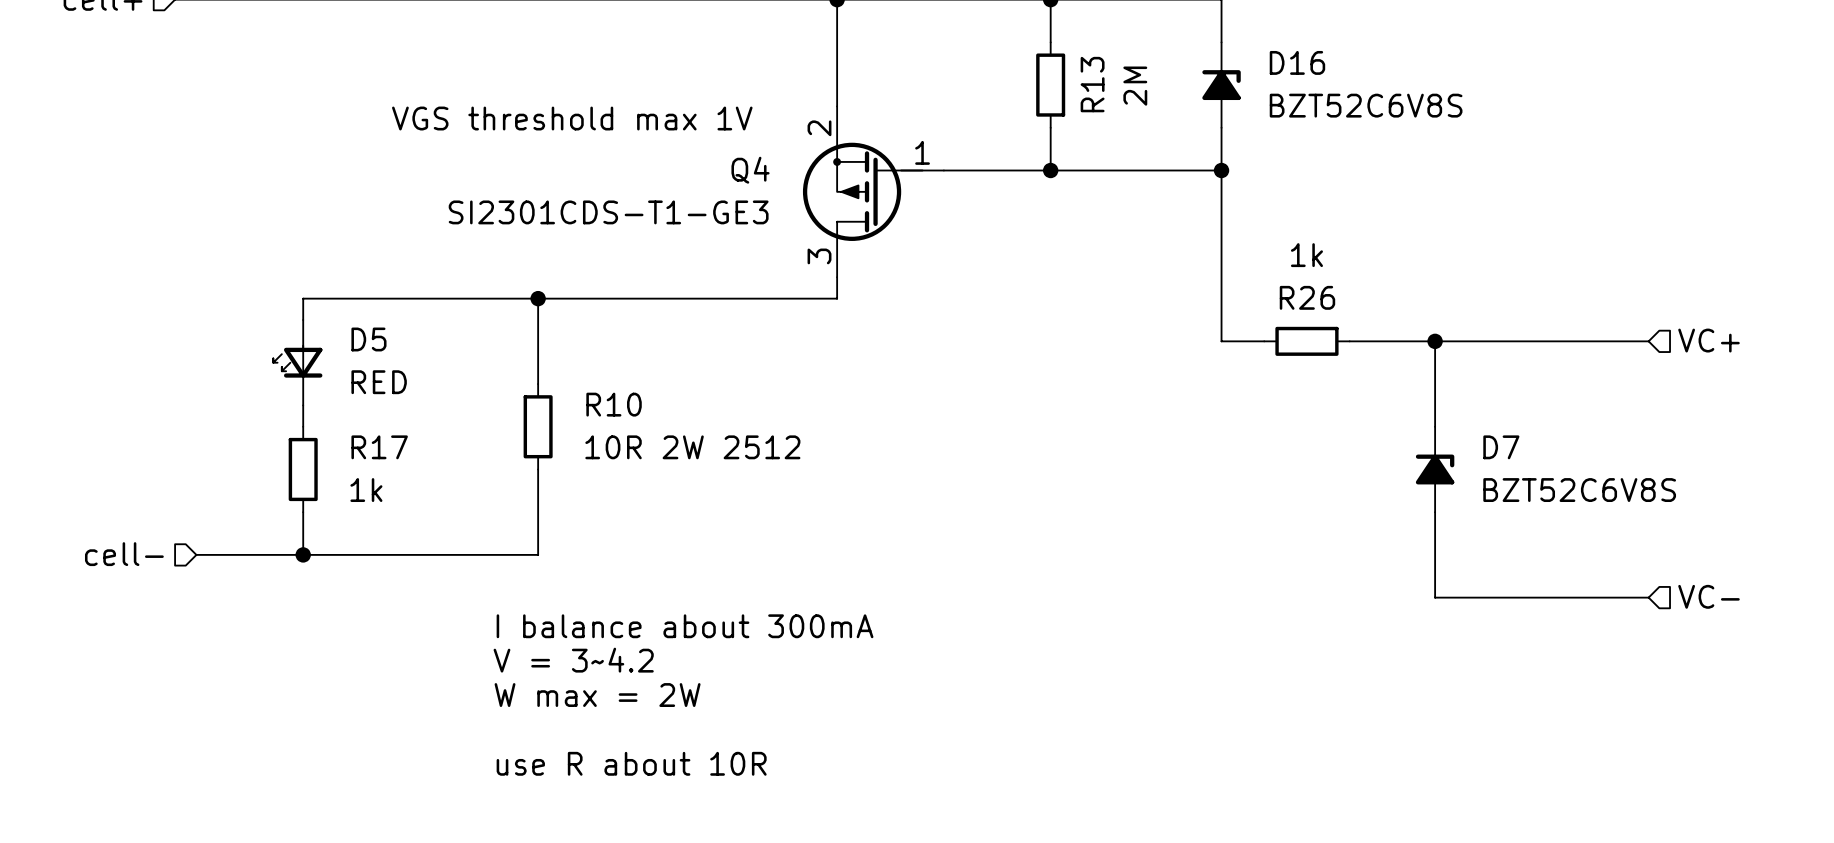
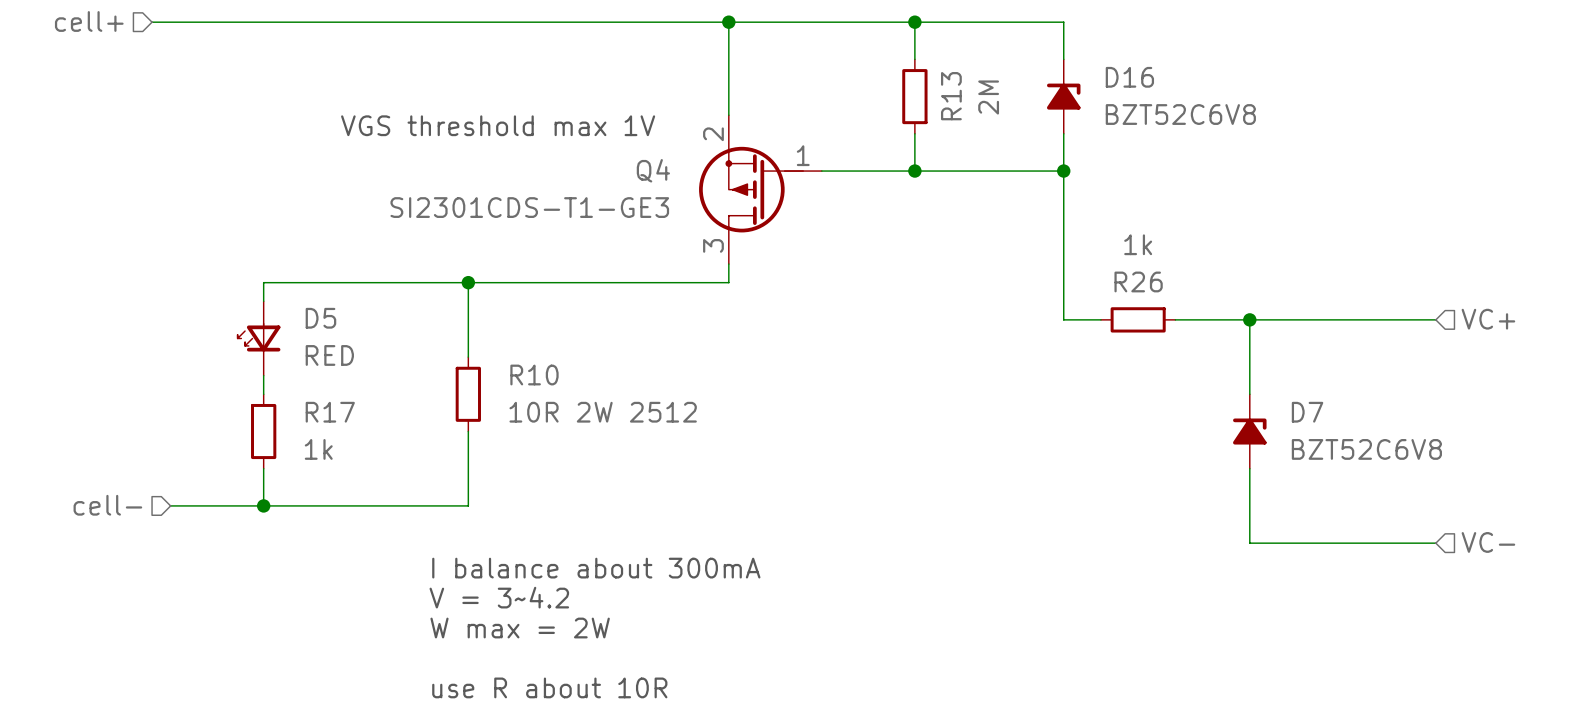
D16 value: BZT52C6V8S (1366, 105) -> BZT52C6V8 (1180, 114)
D7 value: BZT52C6V8S (1579, 490) -> BZT52C6V8 (1366, 449)

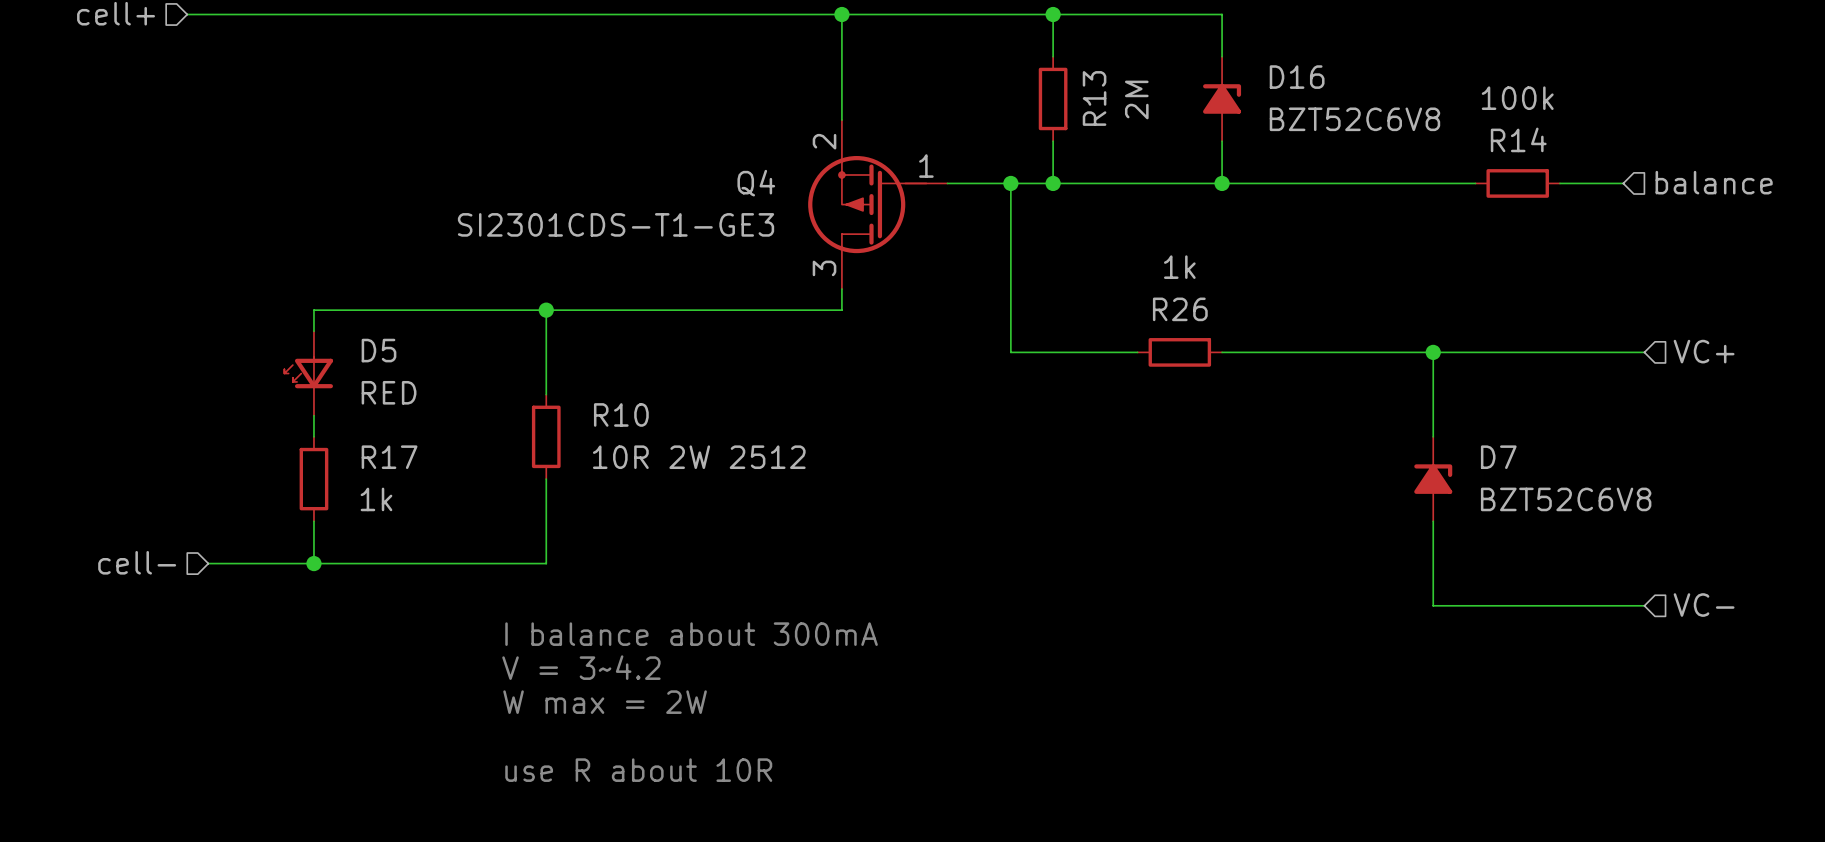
text: VGS threshold max 1V (498, 125) -> none
hierarchical label: none -> balance (1714, 182)
wire: none -> (1010, 183) (1010, 352) (1137, 352)
junction: none -> (1010, 183)
wire: (1063, 171) (1063, 319) -> (1222, 183) (1475, 183)
R14: none -> 100k (1517, 183)
wire: none -> (1559, 183) (1623, 183)
wire: none -> (1264, 352) (1348, 352)
R26 position: (1138, 319) -> (1179, 352)

